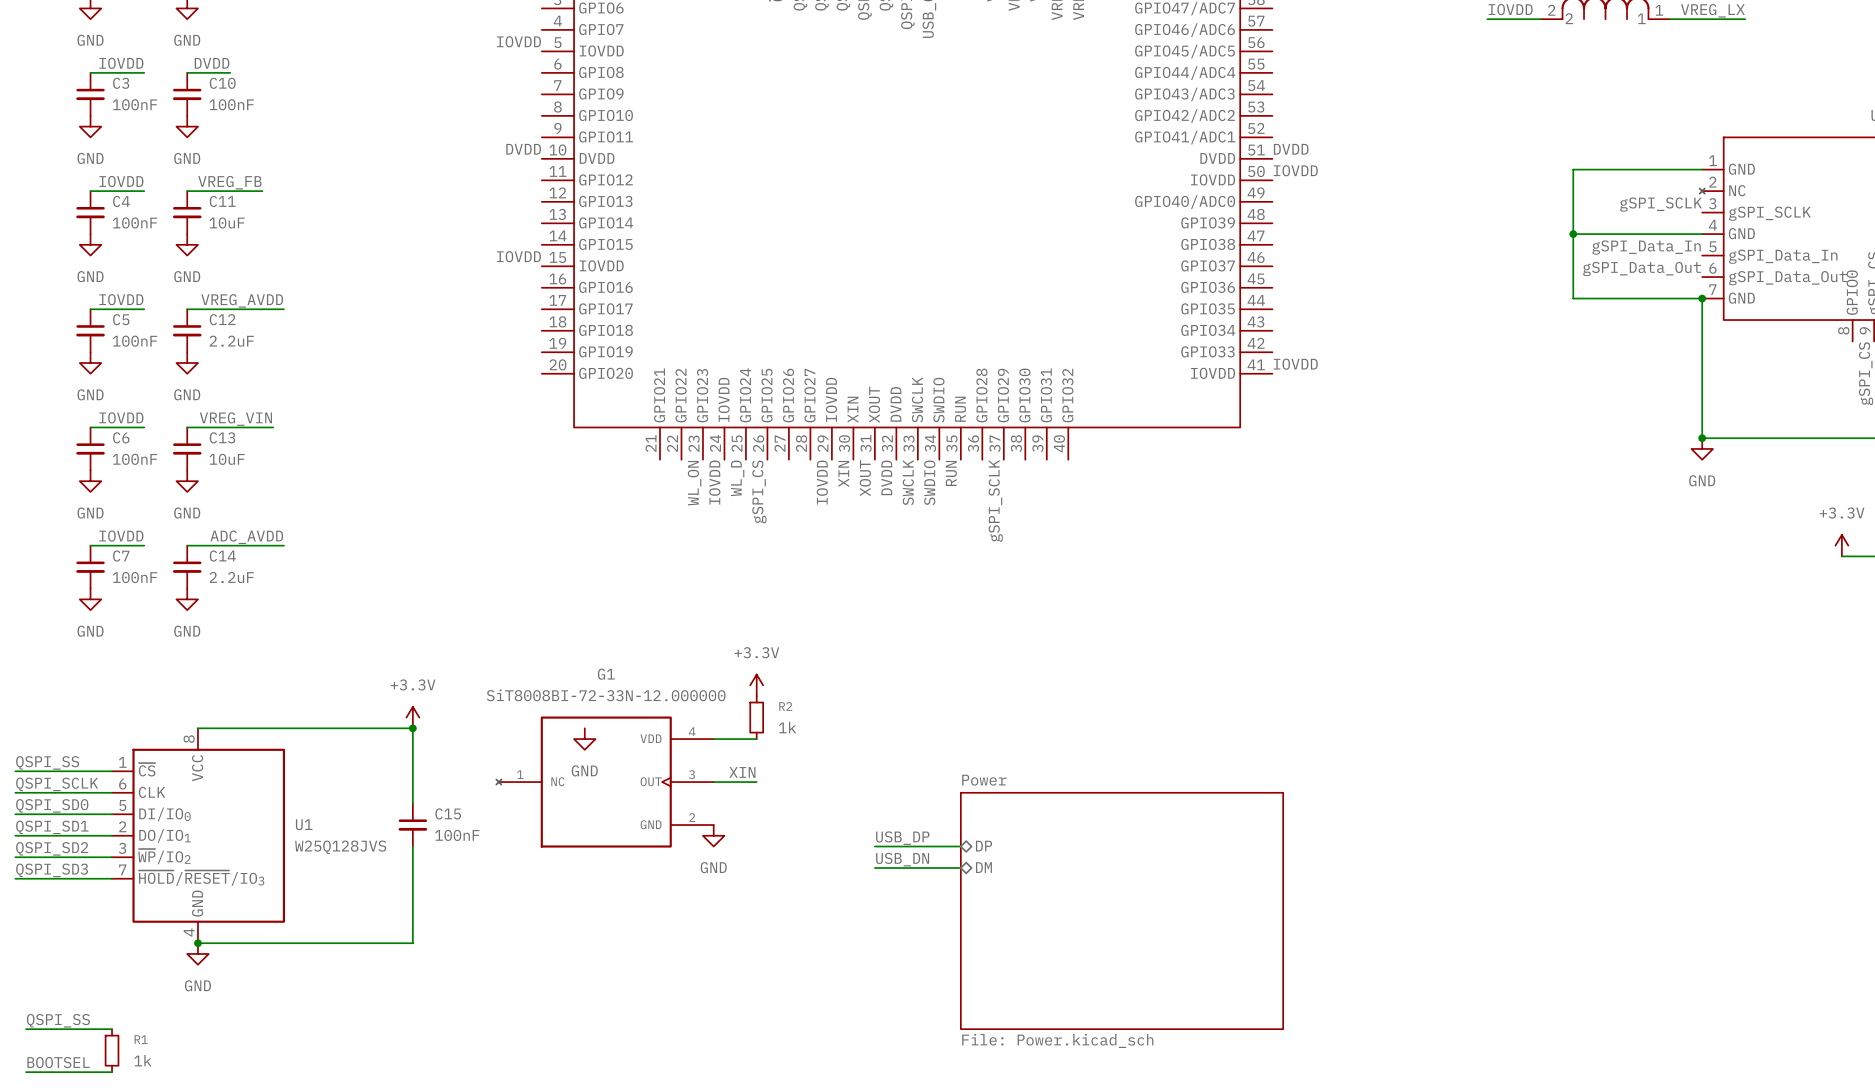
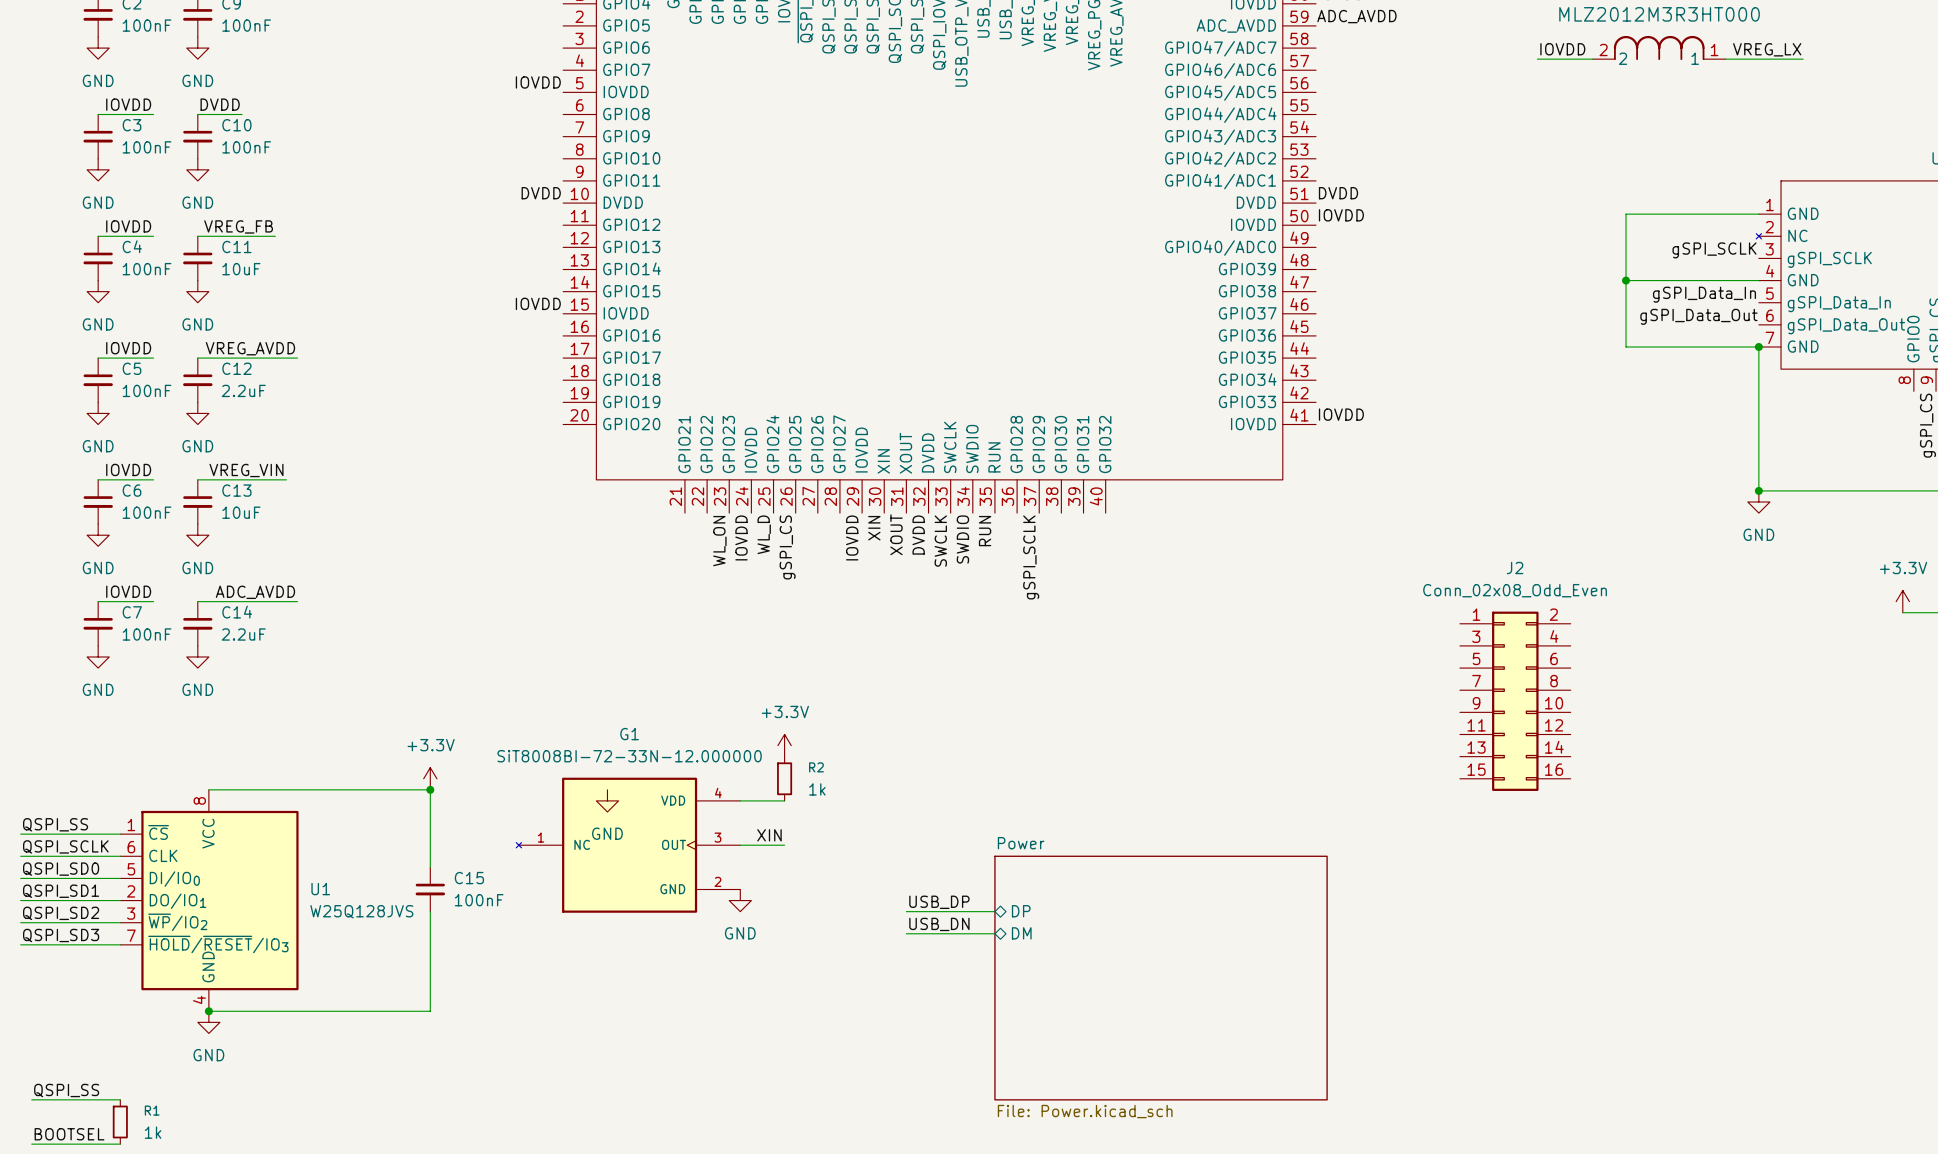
J2: none -> Conn_02x08_Odd_Even (1515, 701)

